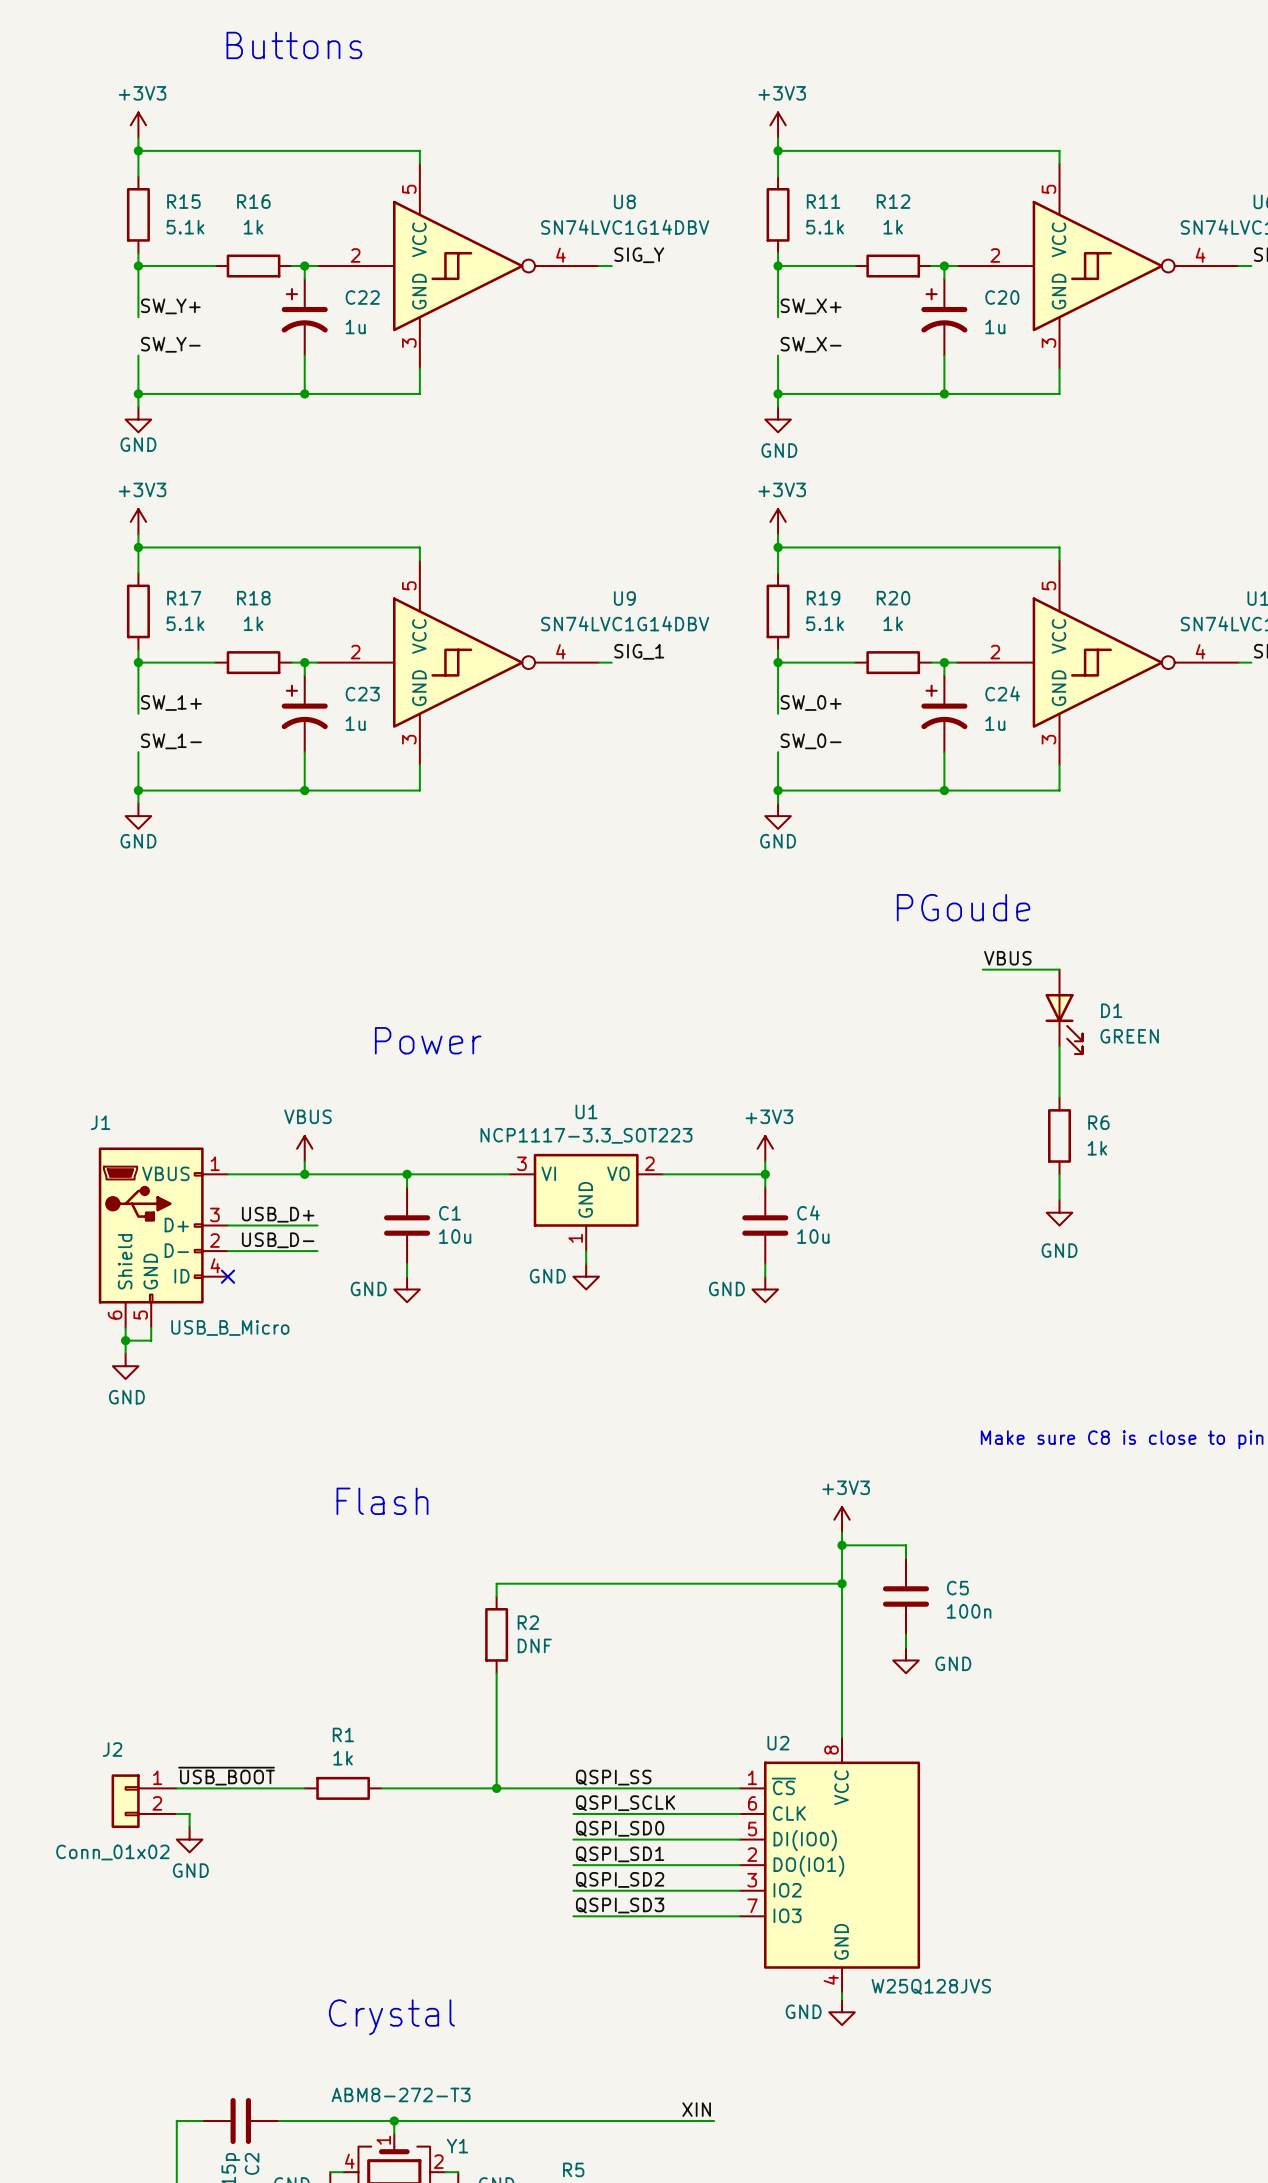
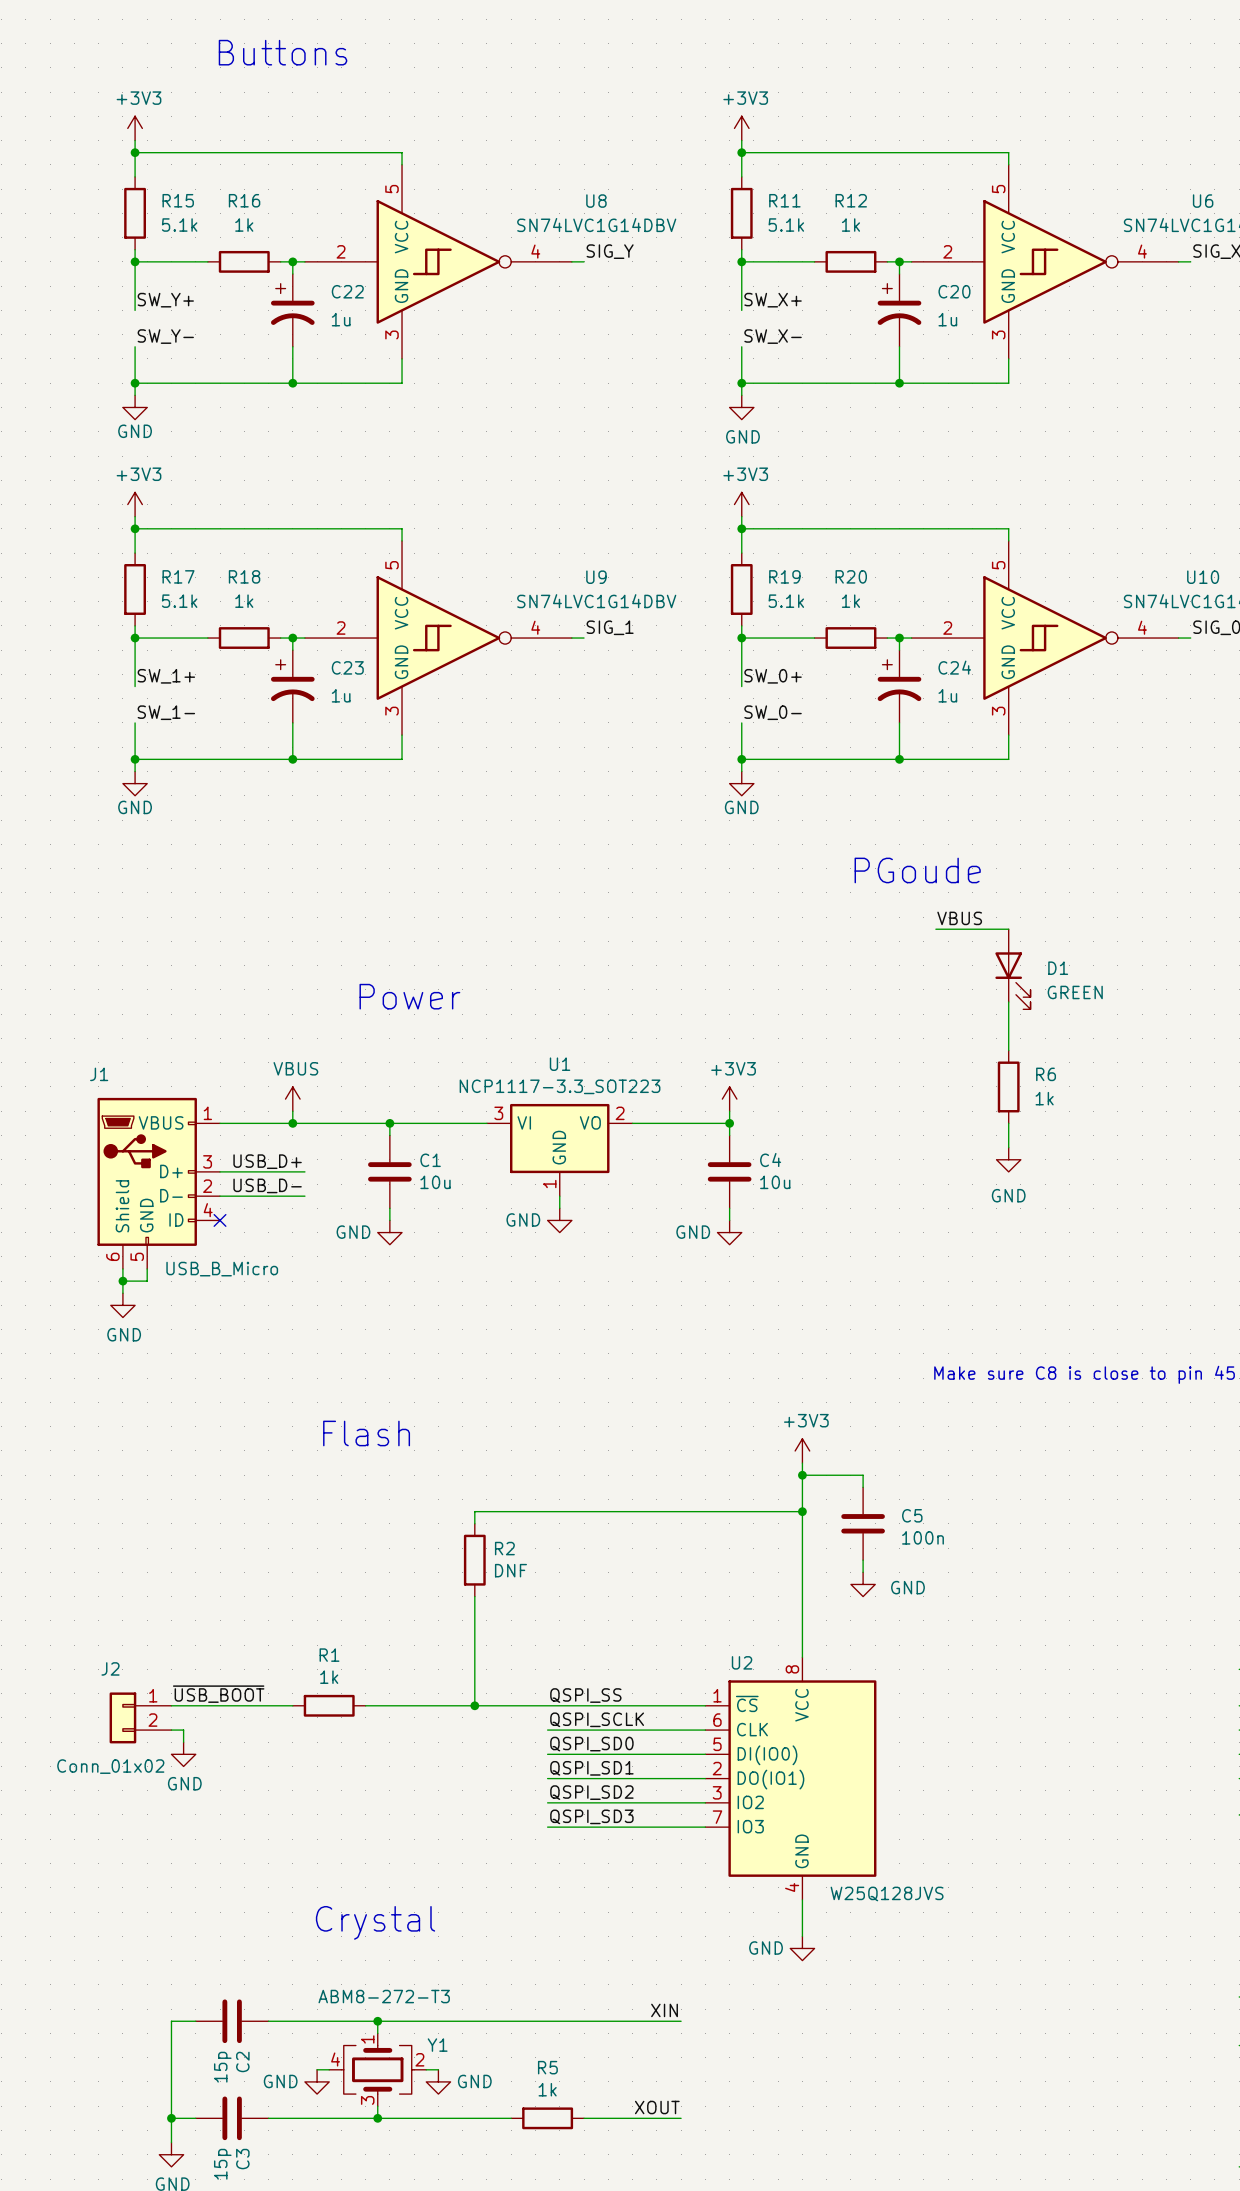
D1 symbol: [1045, 969, 1083, 1055] -> [995, 929, 1031, 1010]
wire: none -> (802, 1905) (802, 1936)
power symbol position: GND (842, 2012) -> GND (802, 1948)

